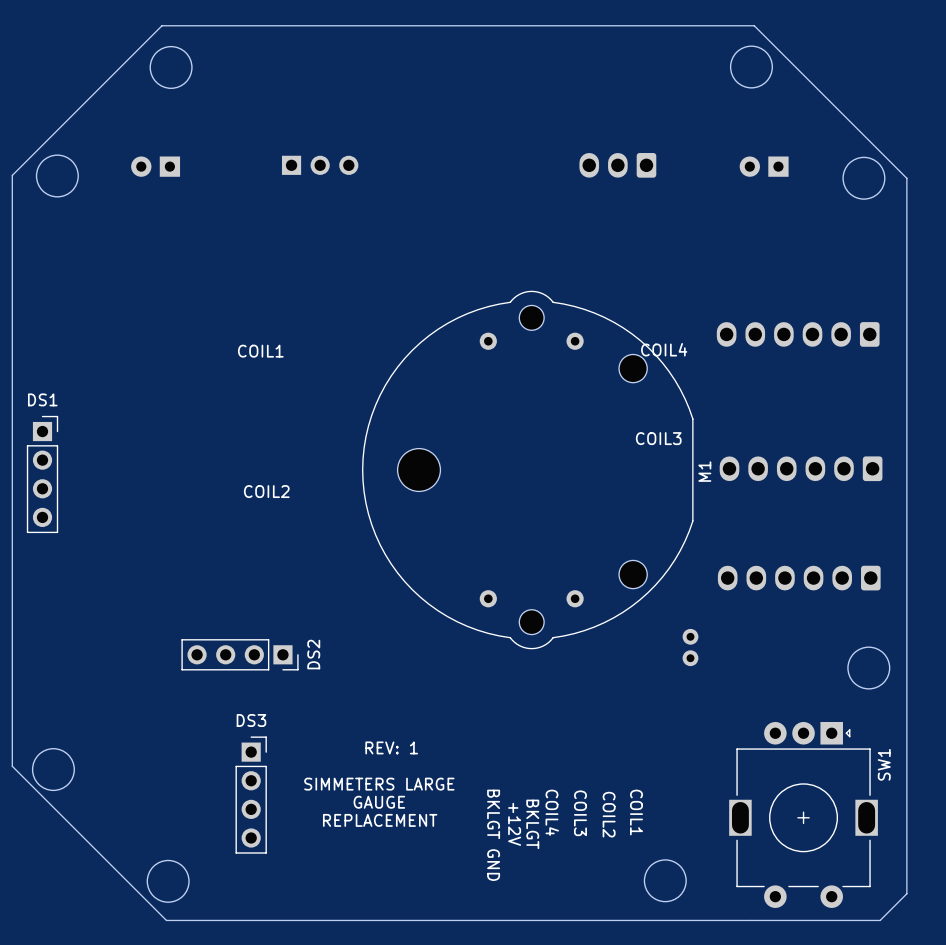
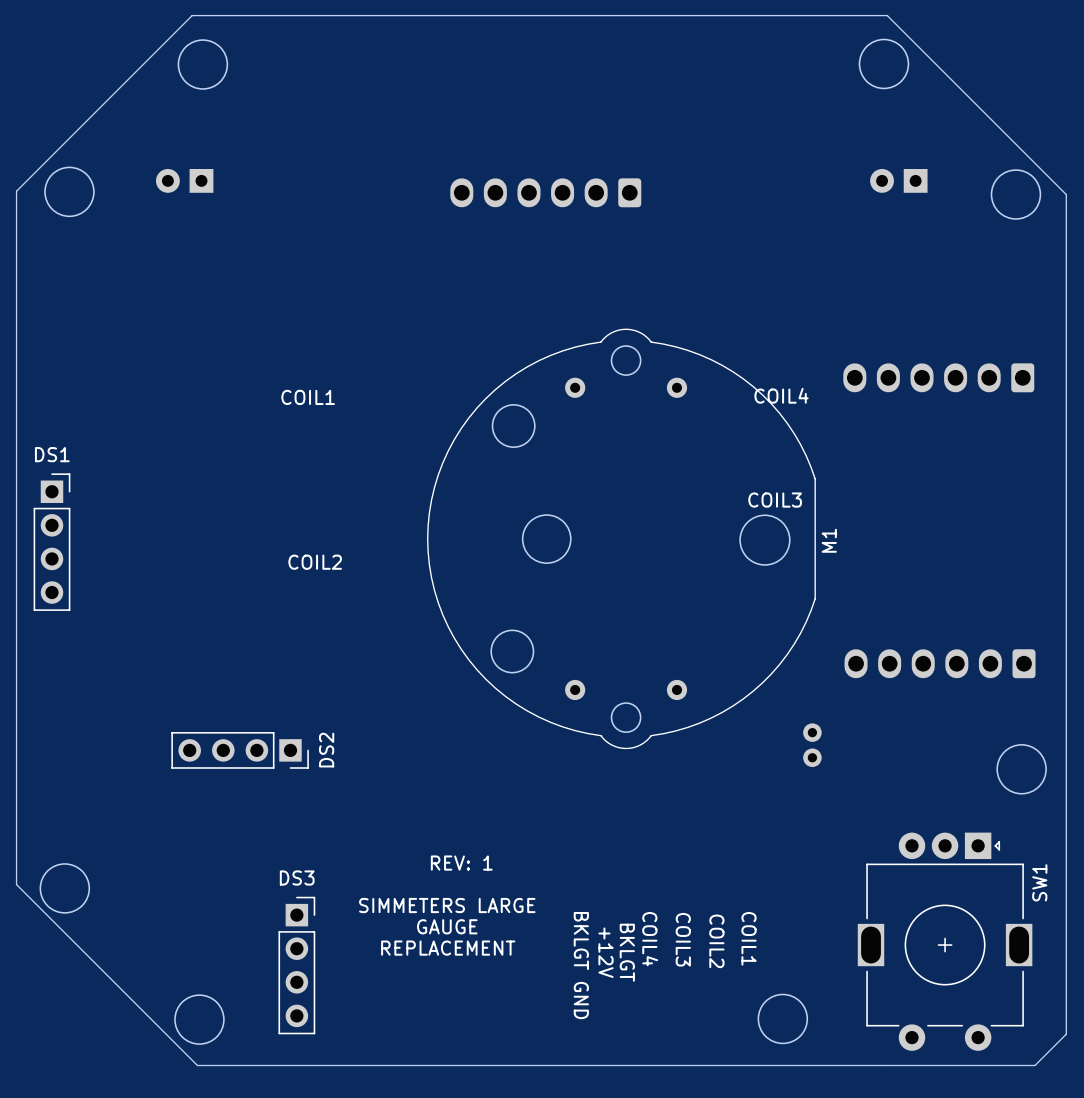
part: (320, 165) -> none
part: (617, 165) -> none
part: none -> (545, 192)
M1 footprint: [362, 290, 694, 650] -> [427, 328, 816, 750]
part: (801, 468) -> none
DS2 position: (240, 654) -> (240, 750)
DS3 position: (251, 795) -> (296, 965)

